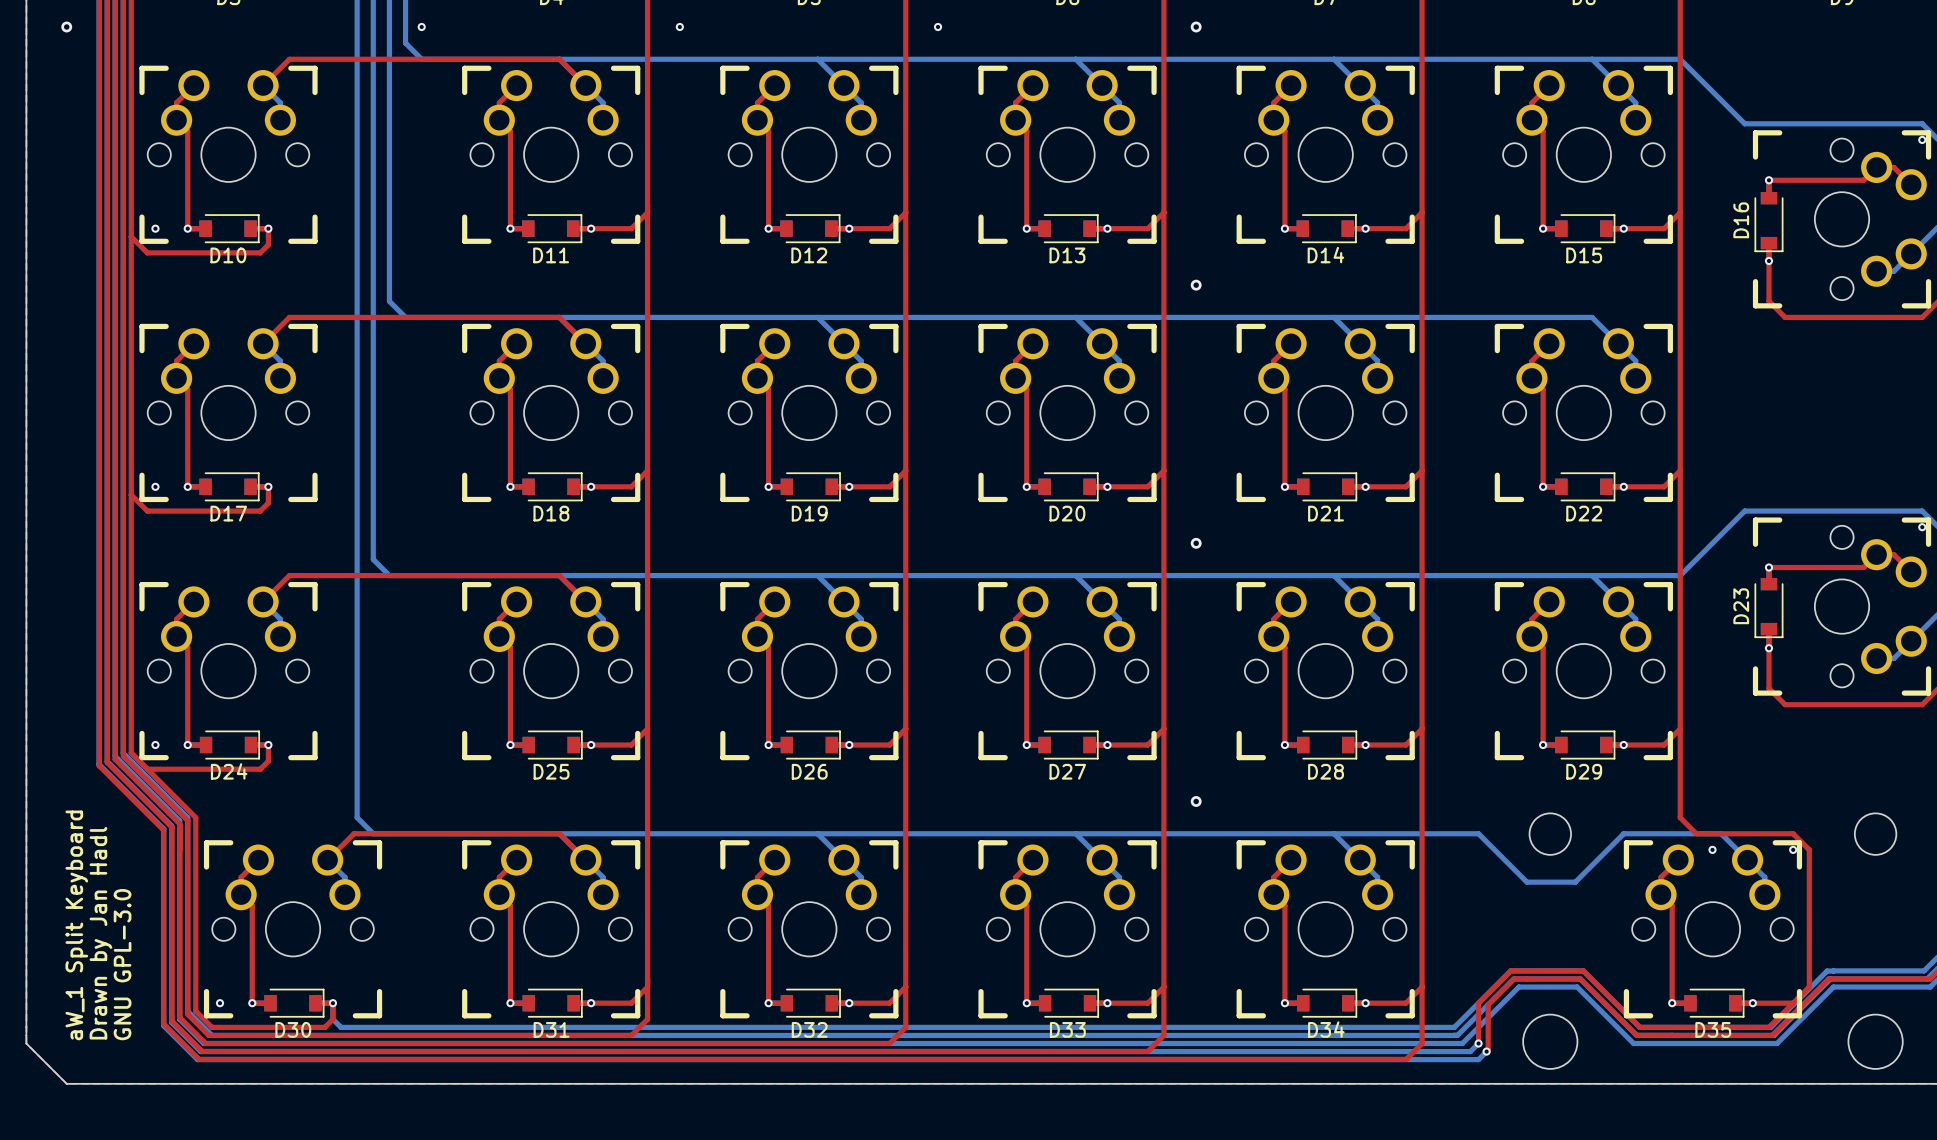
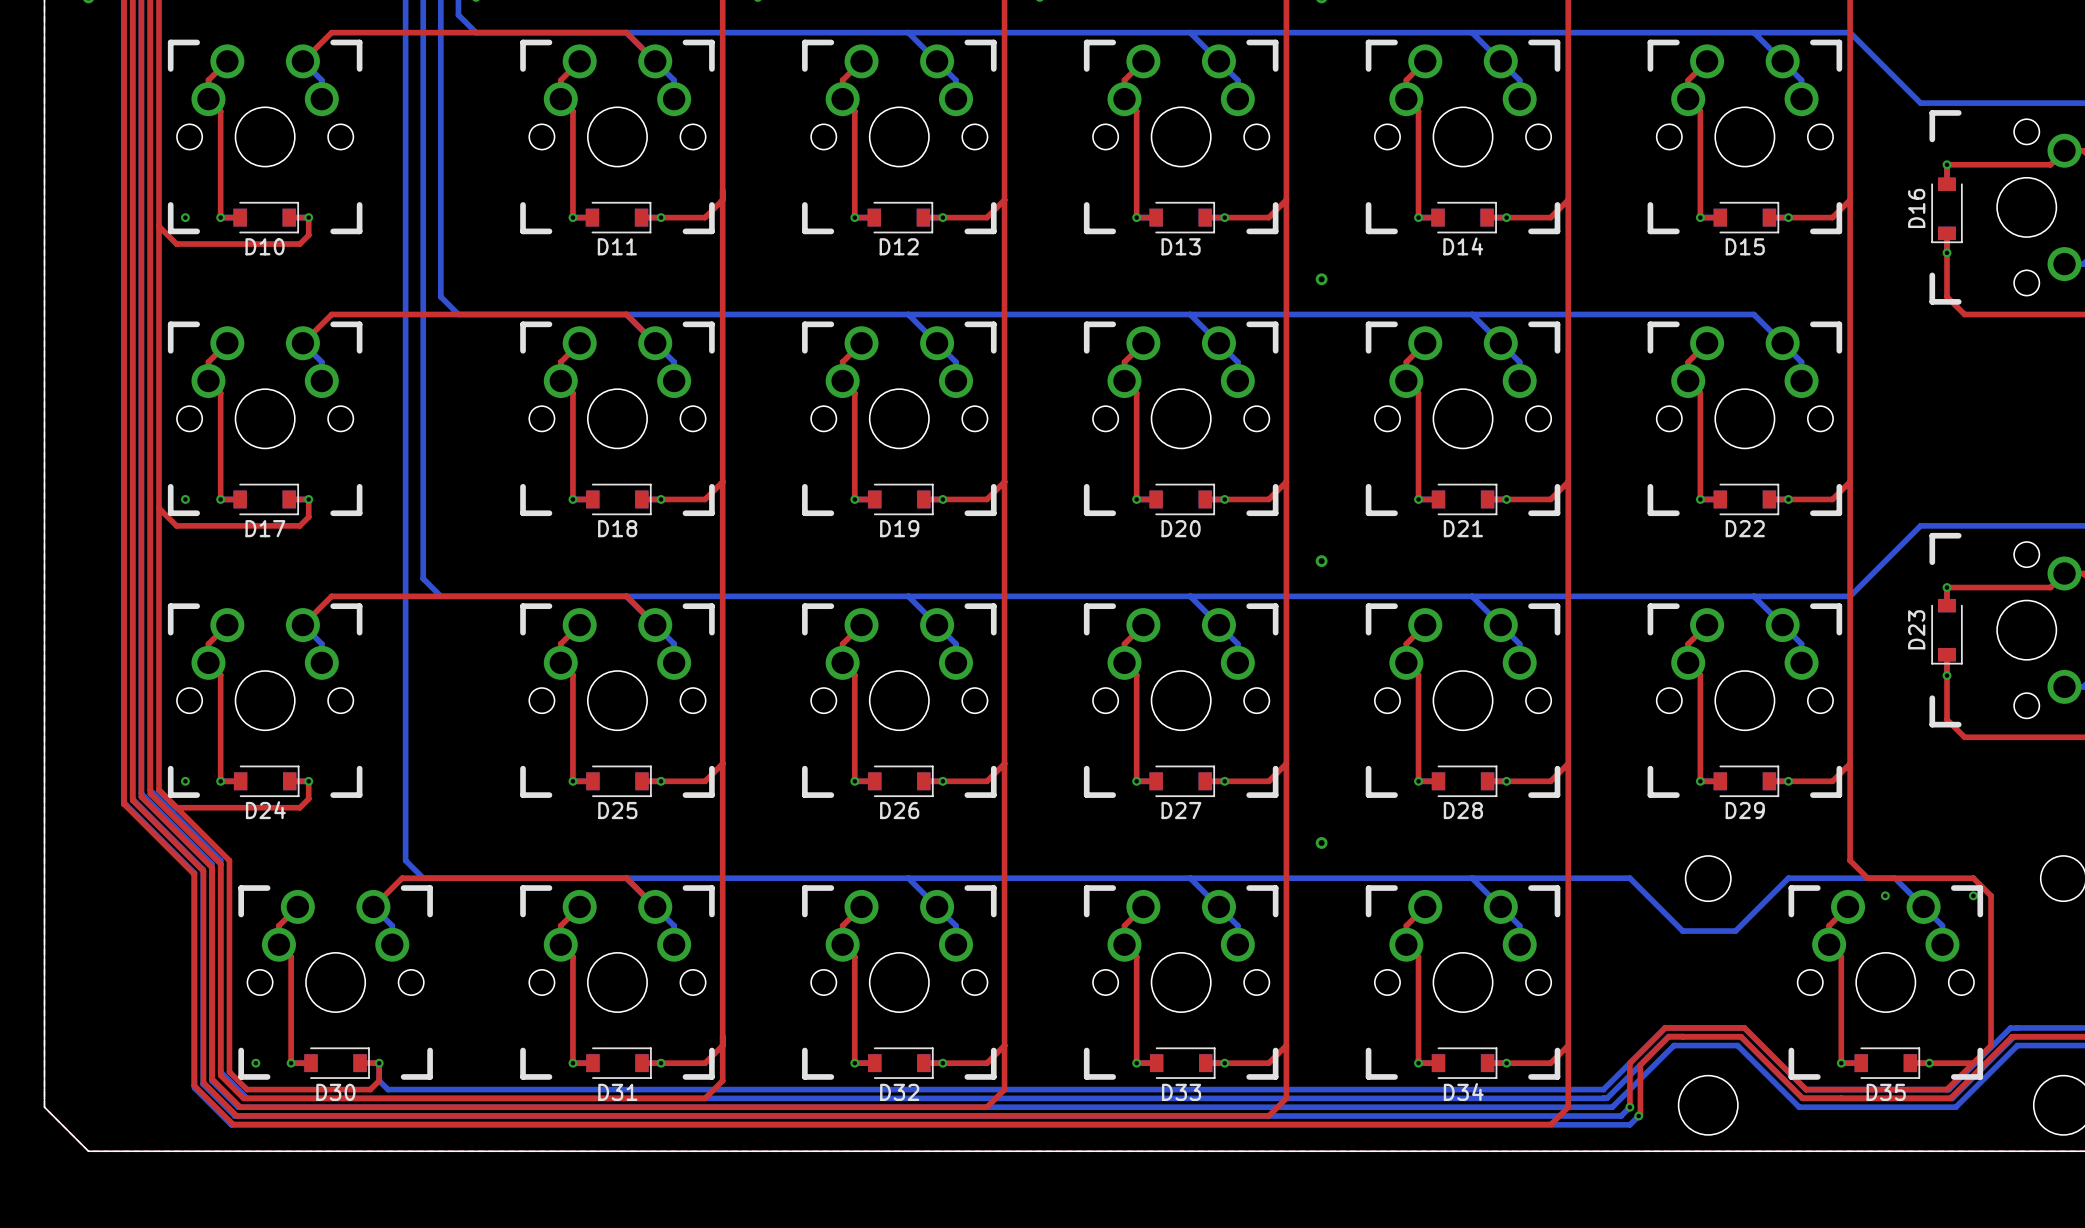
text: aW_1 Split Keyboard (76, 925) -> none
text: Drawn by Jan Hadl (100, 933) -> none
text: GNU GPL-3.0 (122, 964) -> none

